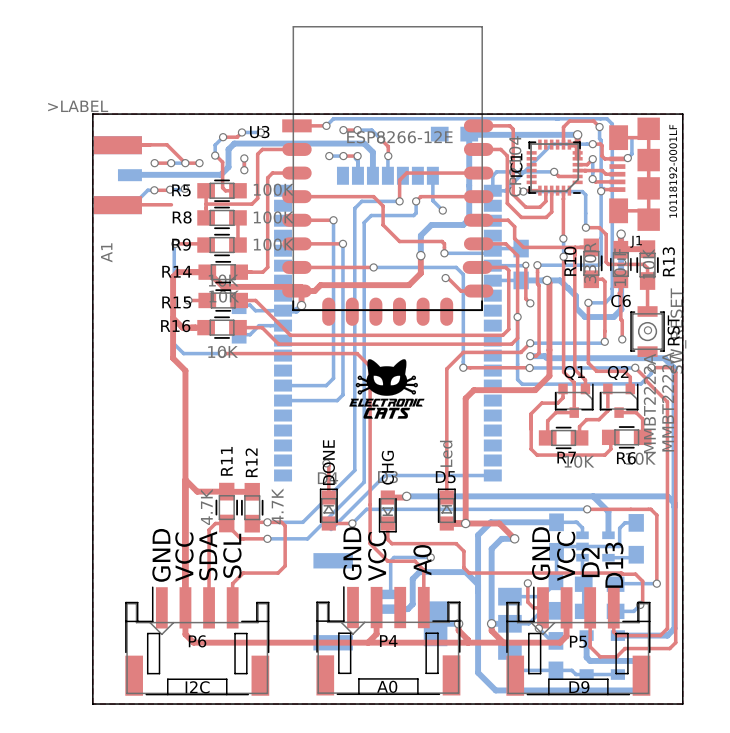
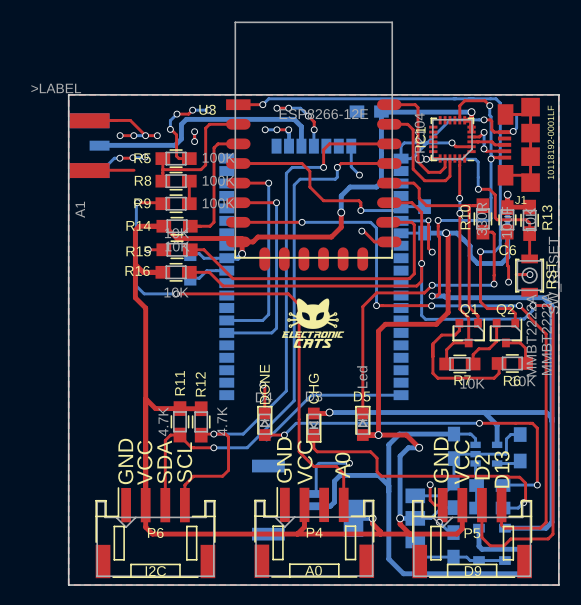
top track: none -> (516, 274) (529, 274)

